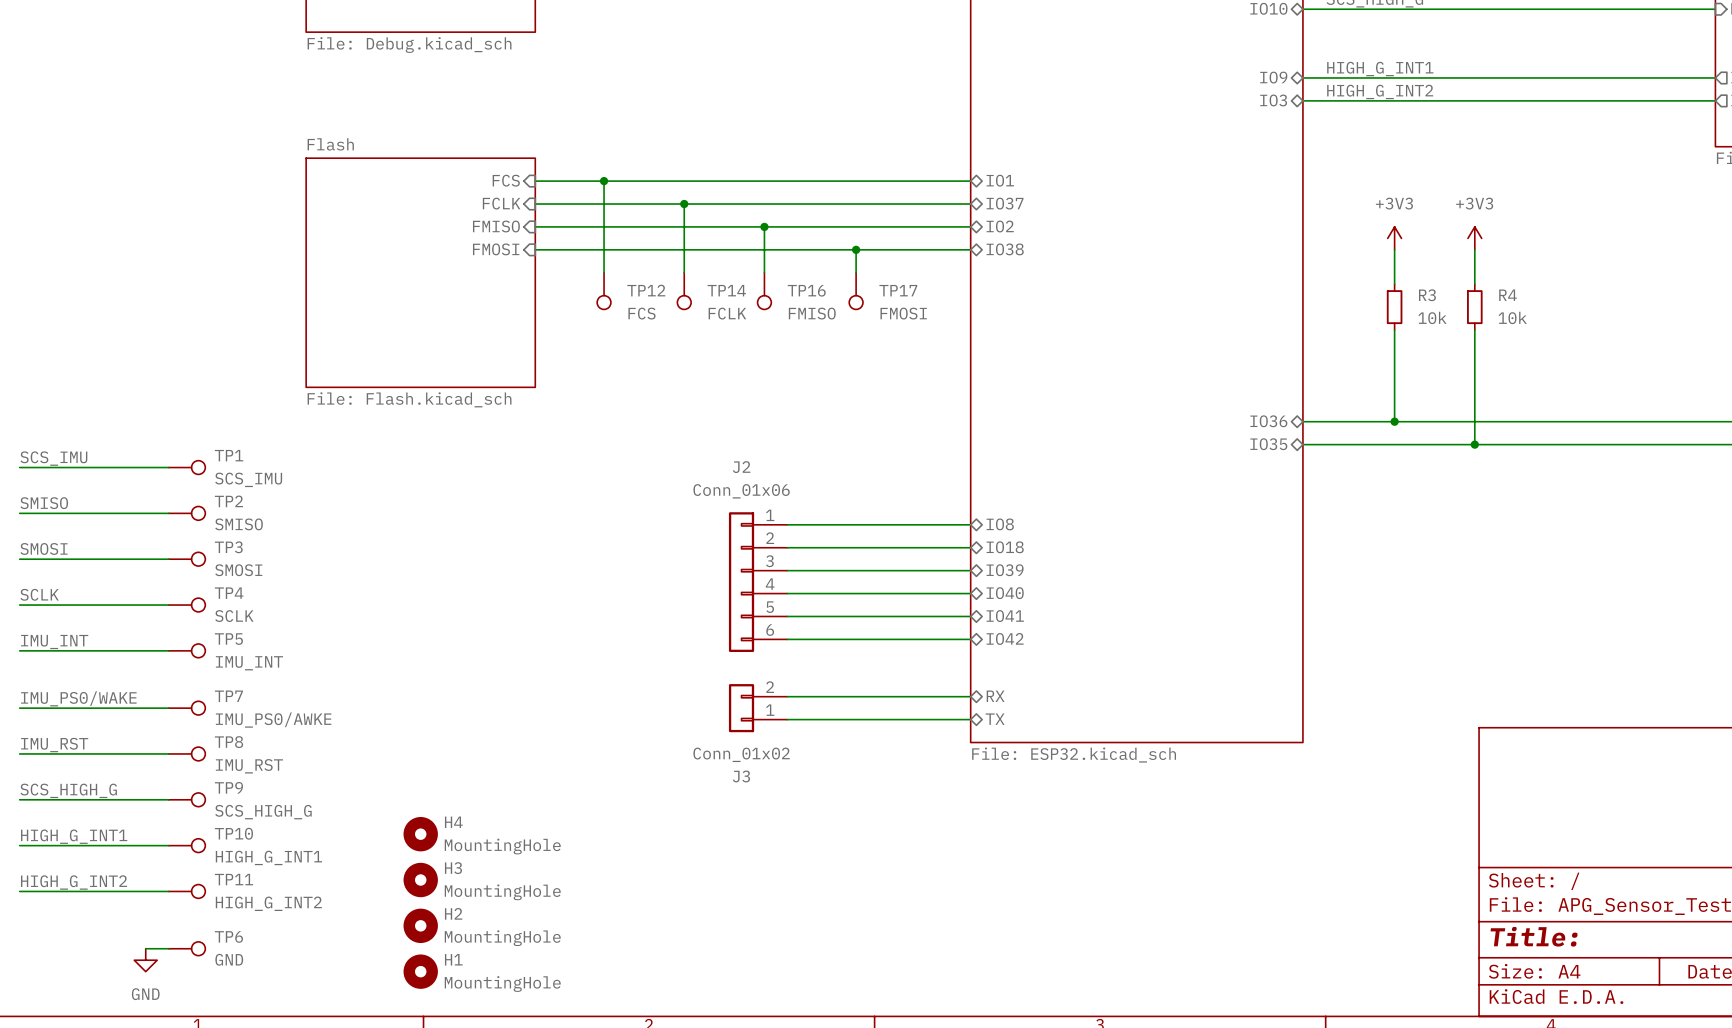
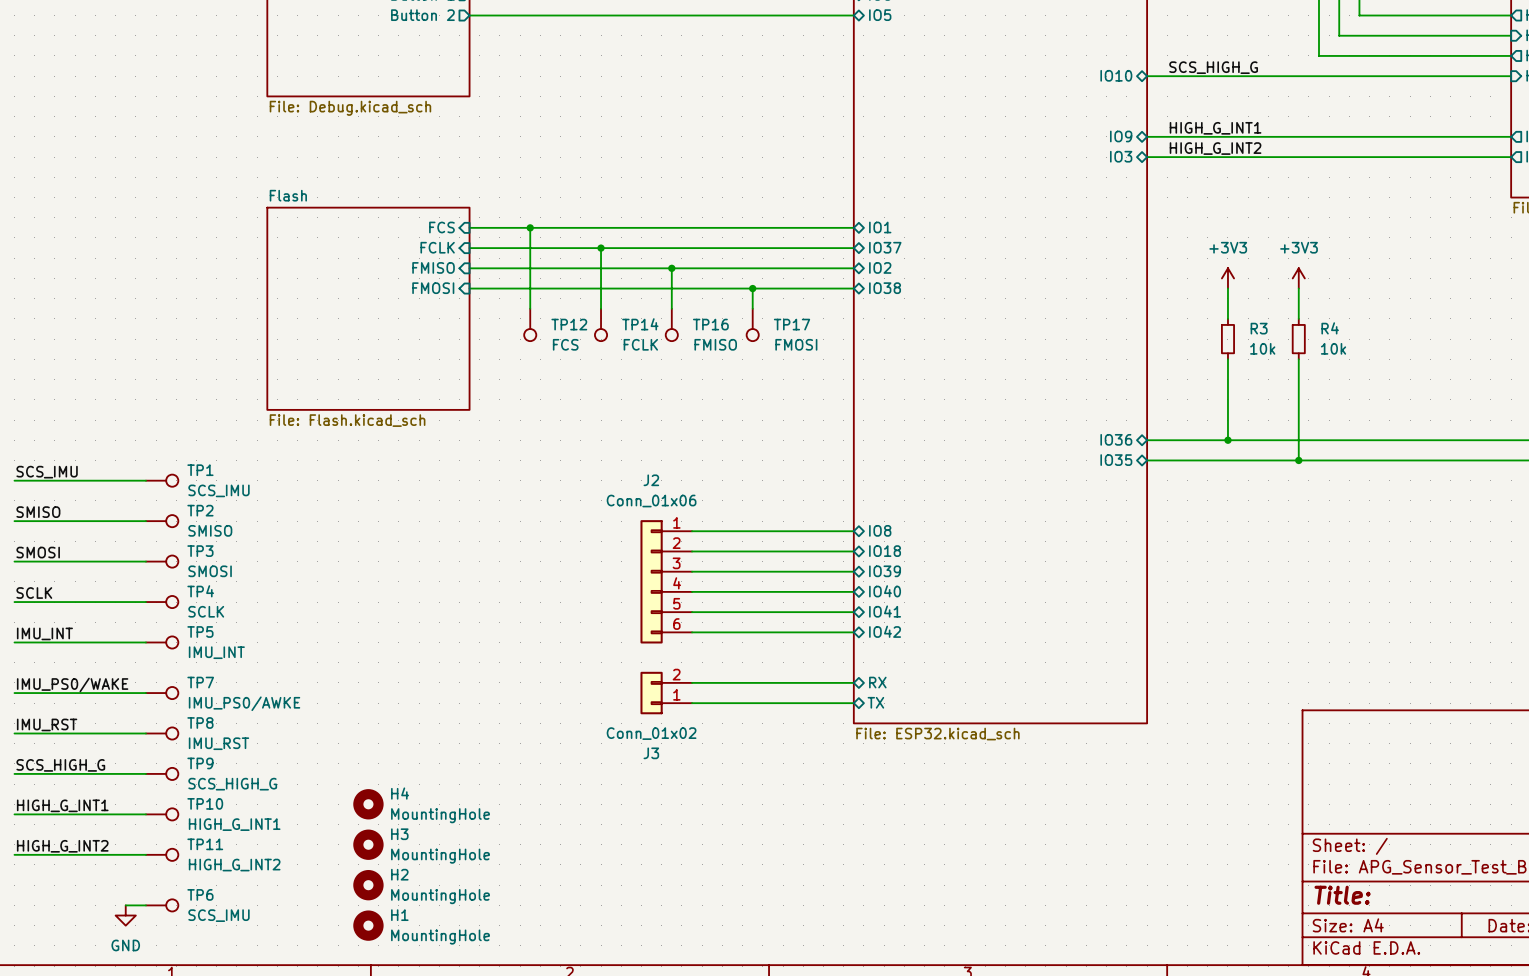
TP6 value: GND (229, 959) -> SCS_IMU (218, 915)

